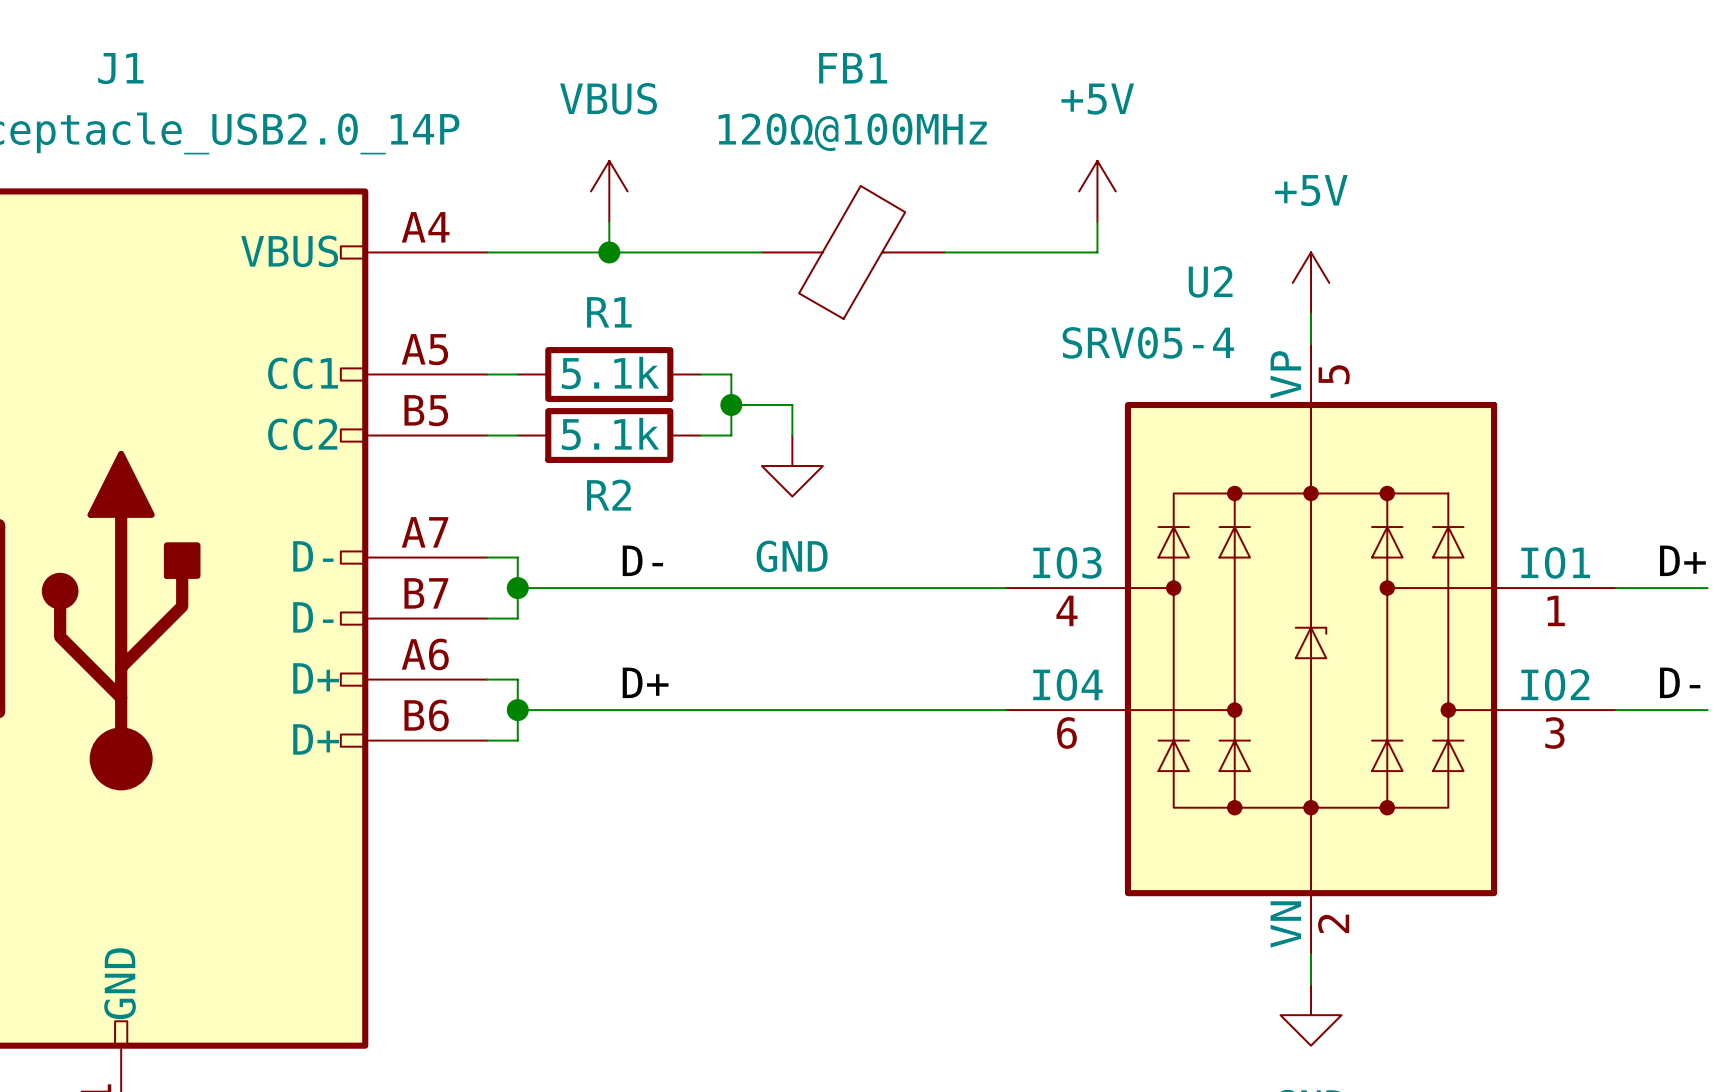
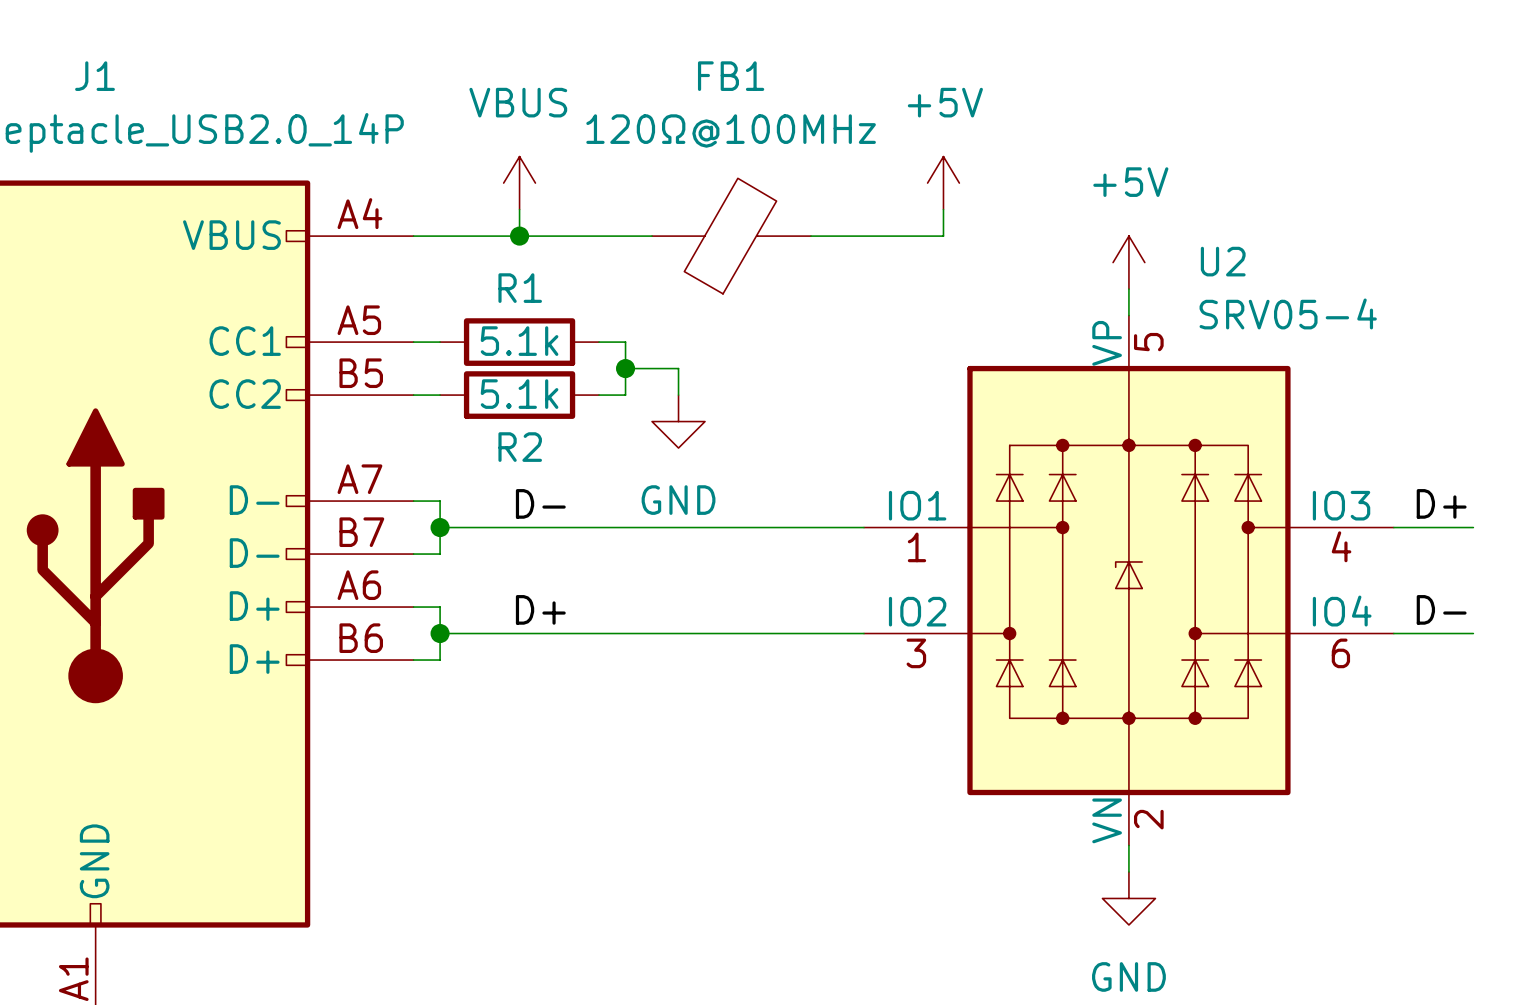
U2 flip: as is (1311, 649) -> left-right (1128, 580)

